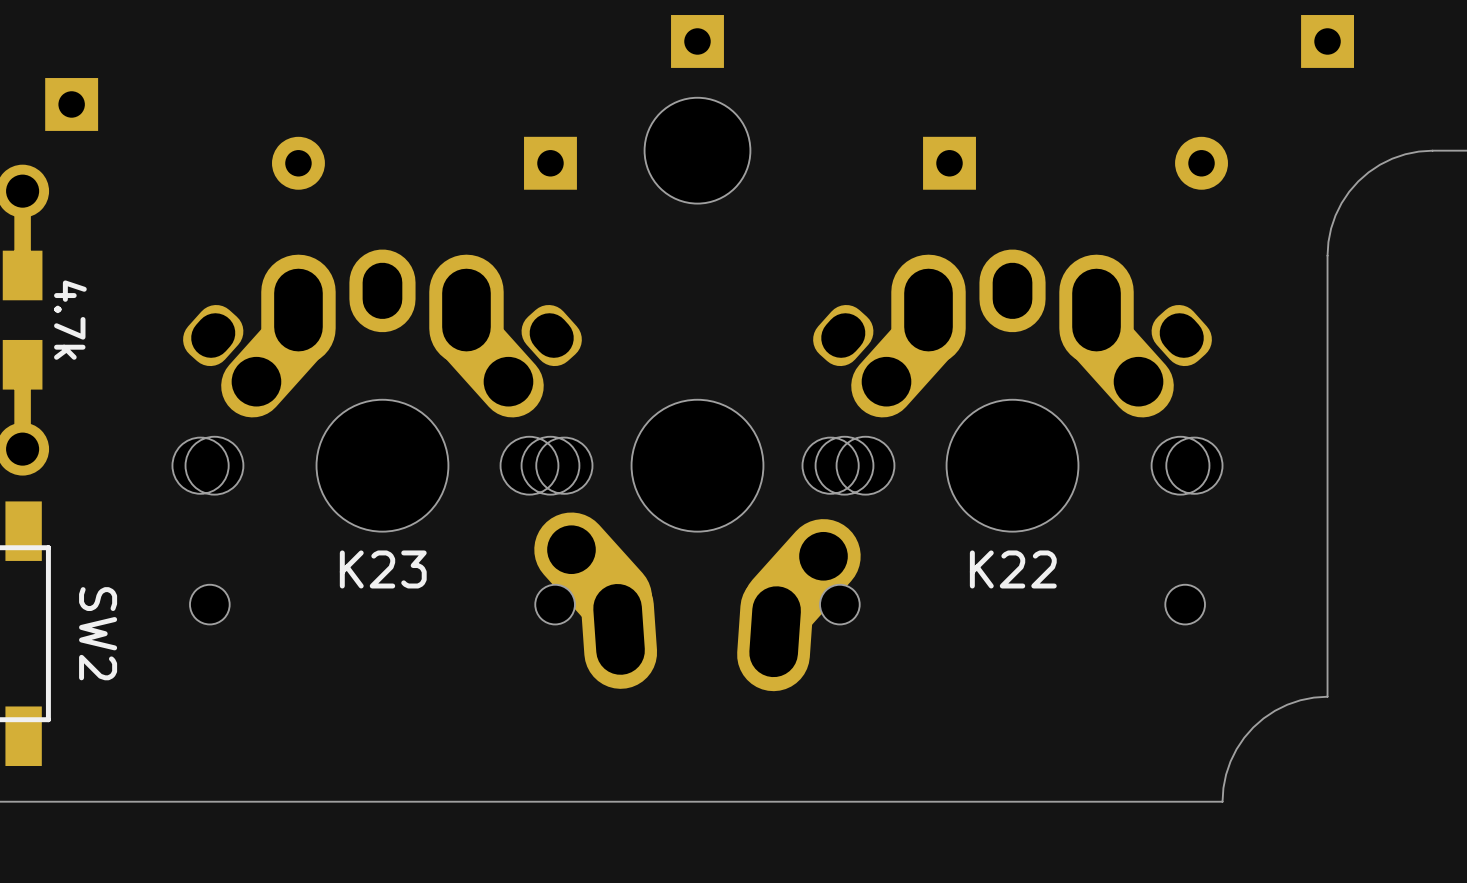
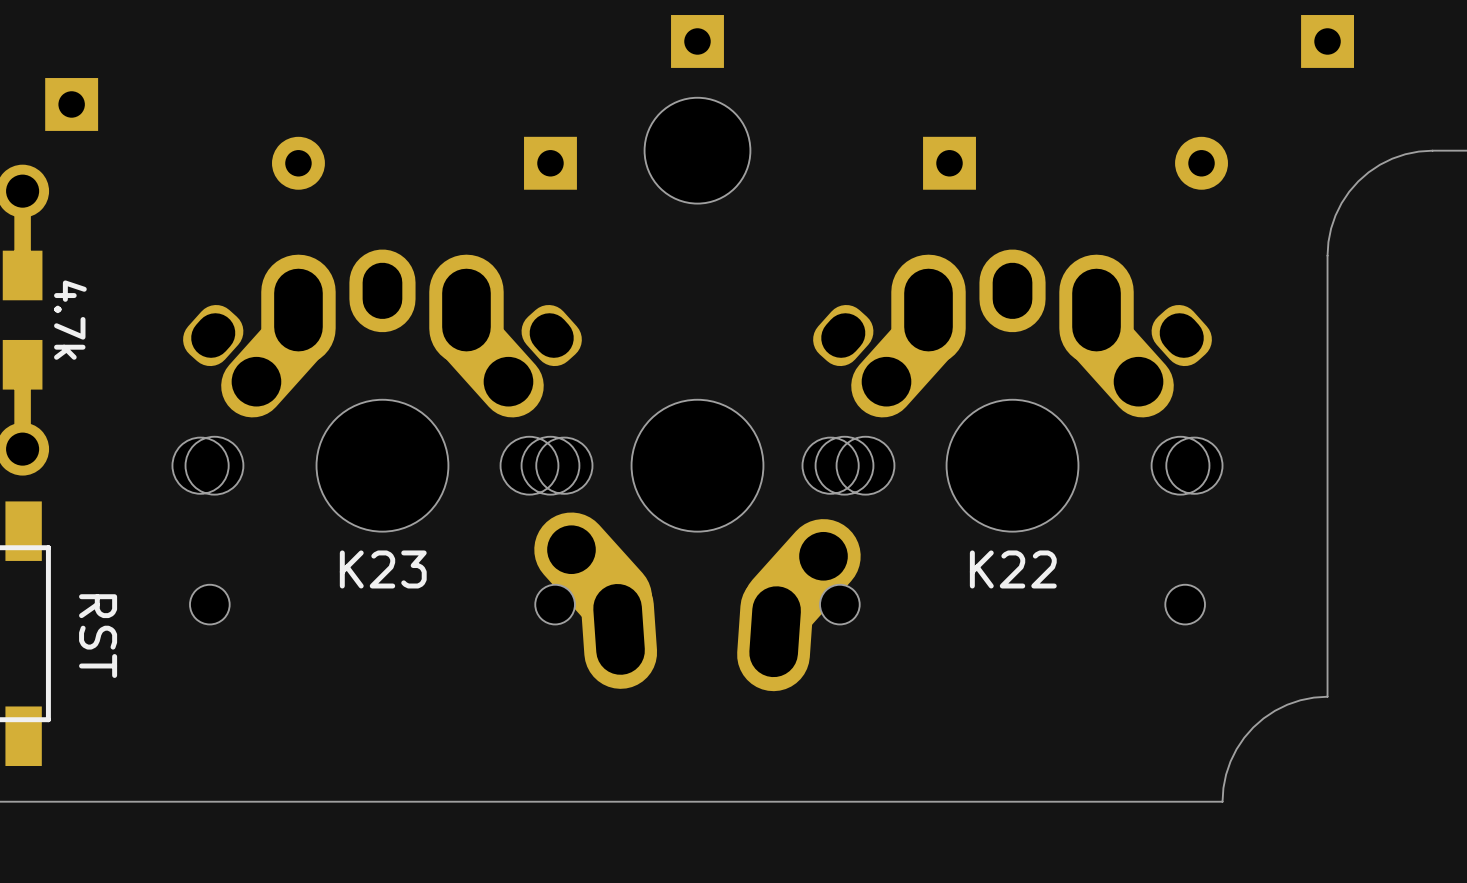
SW2 name: SW2 (98, 633) -> RST (98, 636)

